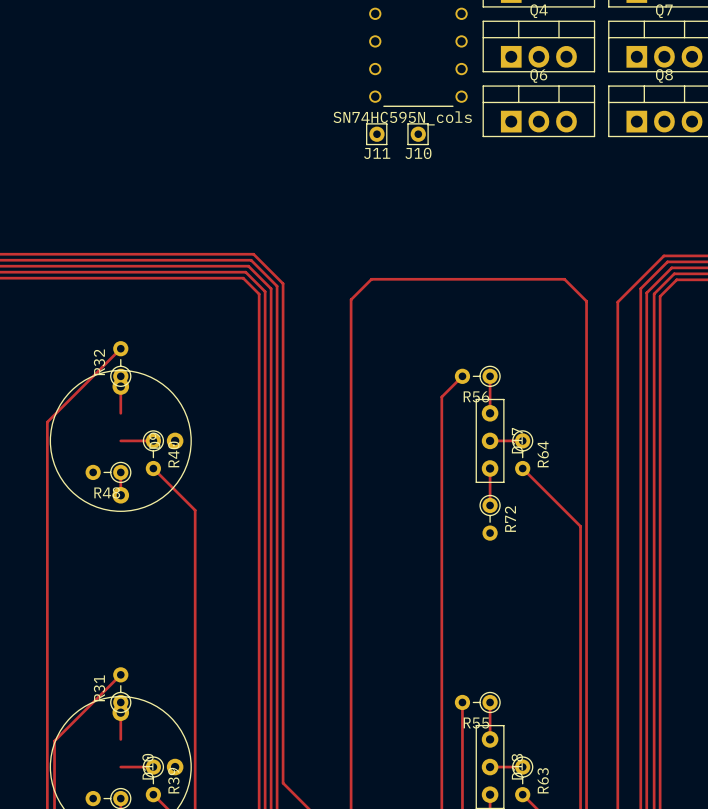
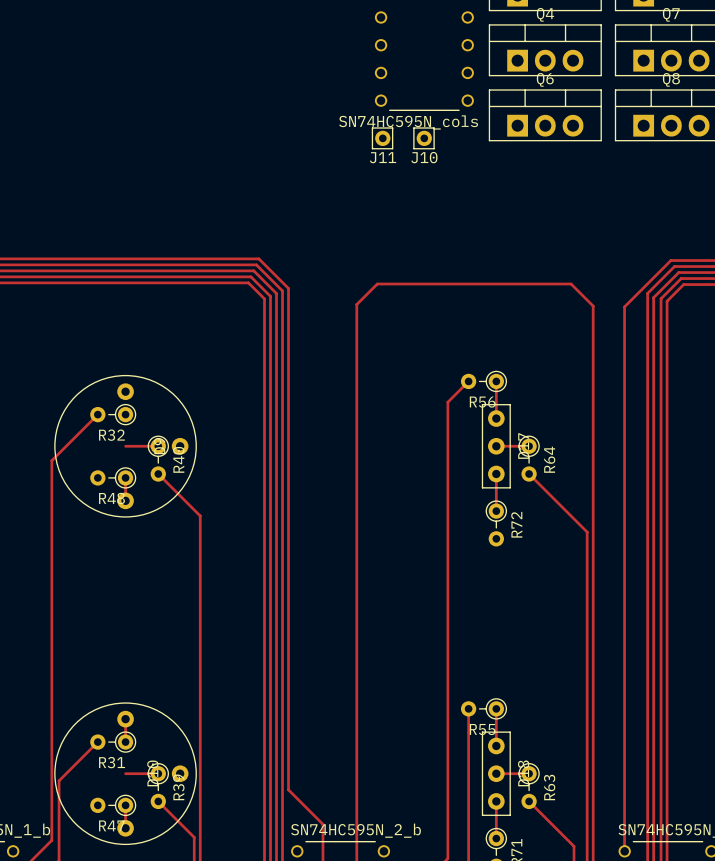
track: (120, 348) (47, 422) (47, 455) -> (97, 414) (51, 460)
R32 rotation: 0° (120, 364) -> 90° counterclockwise (113, 414)
R32 position: (120, 364) -> (113, 414)
track: (120, 376) (120, 413) -> none
track: (120, 674) (54, 741) (54, 774) -> (97, 742) (59, 780)
R31 rotation: 0° (120, 690) -> 90° counterclockwise (113, 742)
R31 position: (120, 690) -> (113, 742)

